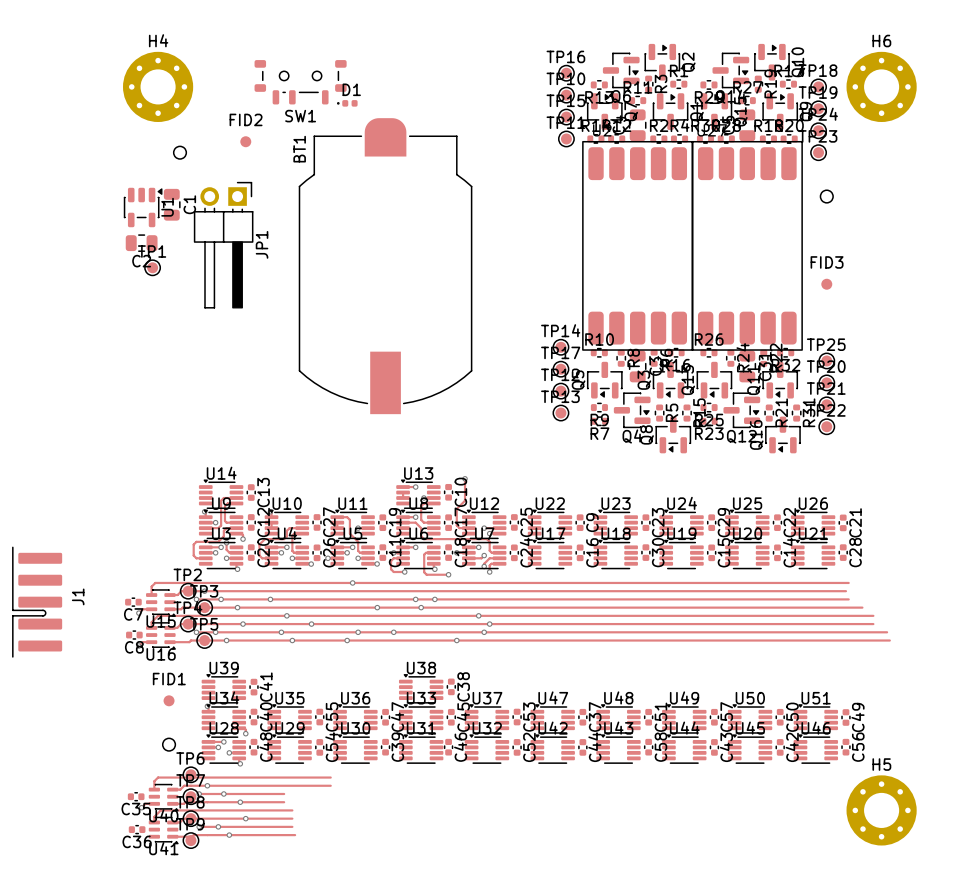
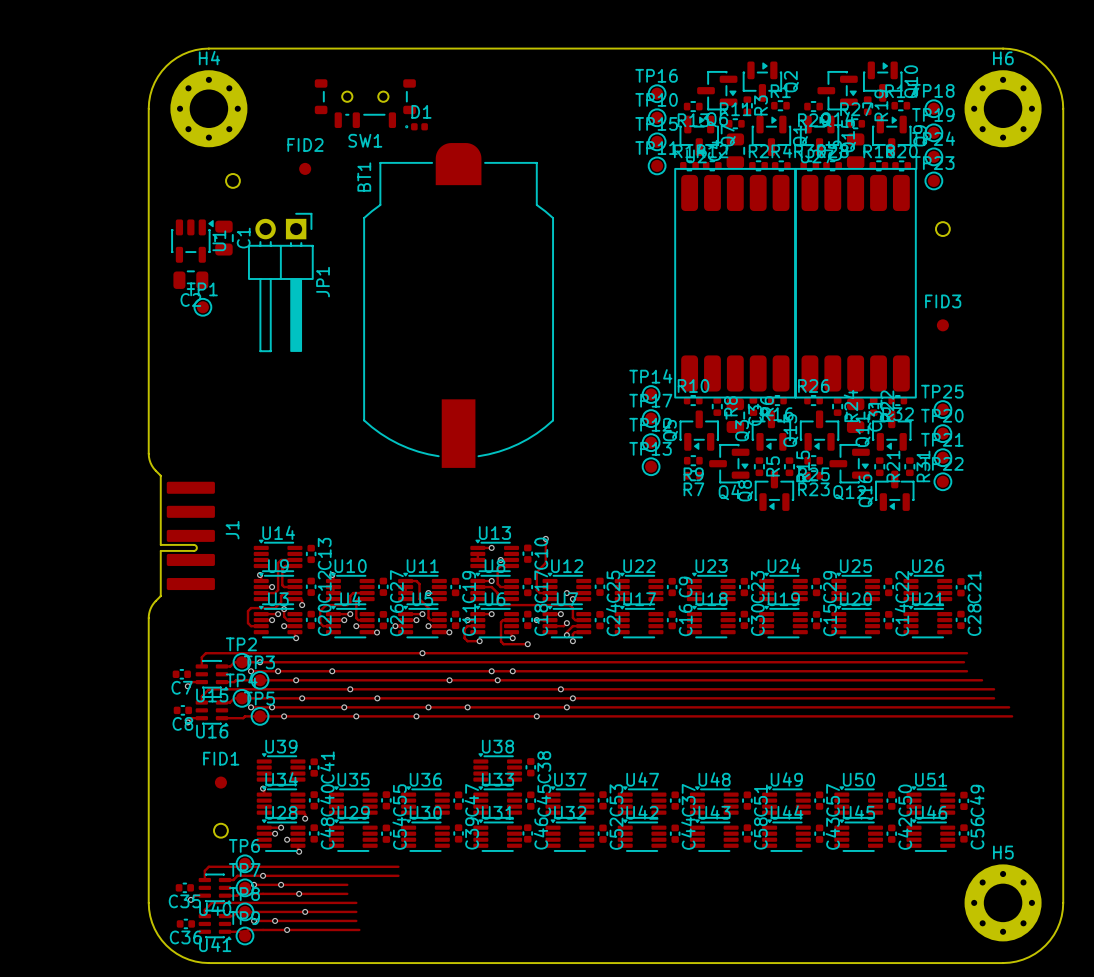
board edge: none -> (160, 475) (151, 465) (148, 453) (148, 108) (150, 95) (157, 76) (166, 66) (182, 54) (195, 50) (208, 48) (1003, 48) (1016, 50) (1035, 57) (1050, 71) (1057, 82) (1061, 95) (1063, 108) (1063, 902) (1061, 916) (1054, 934) (1045, 945) (1035, 953) (1022, 959) (1003, 963) (208, 963) (189, 959) (171, 949) (161, 940) (152, 922) (149, 909) (148, 618) (151, 606) (160, 596)
J1 position: (37, 602) -> (187, 535)

